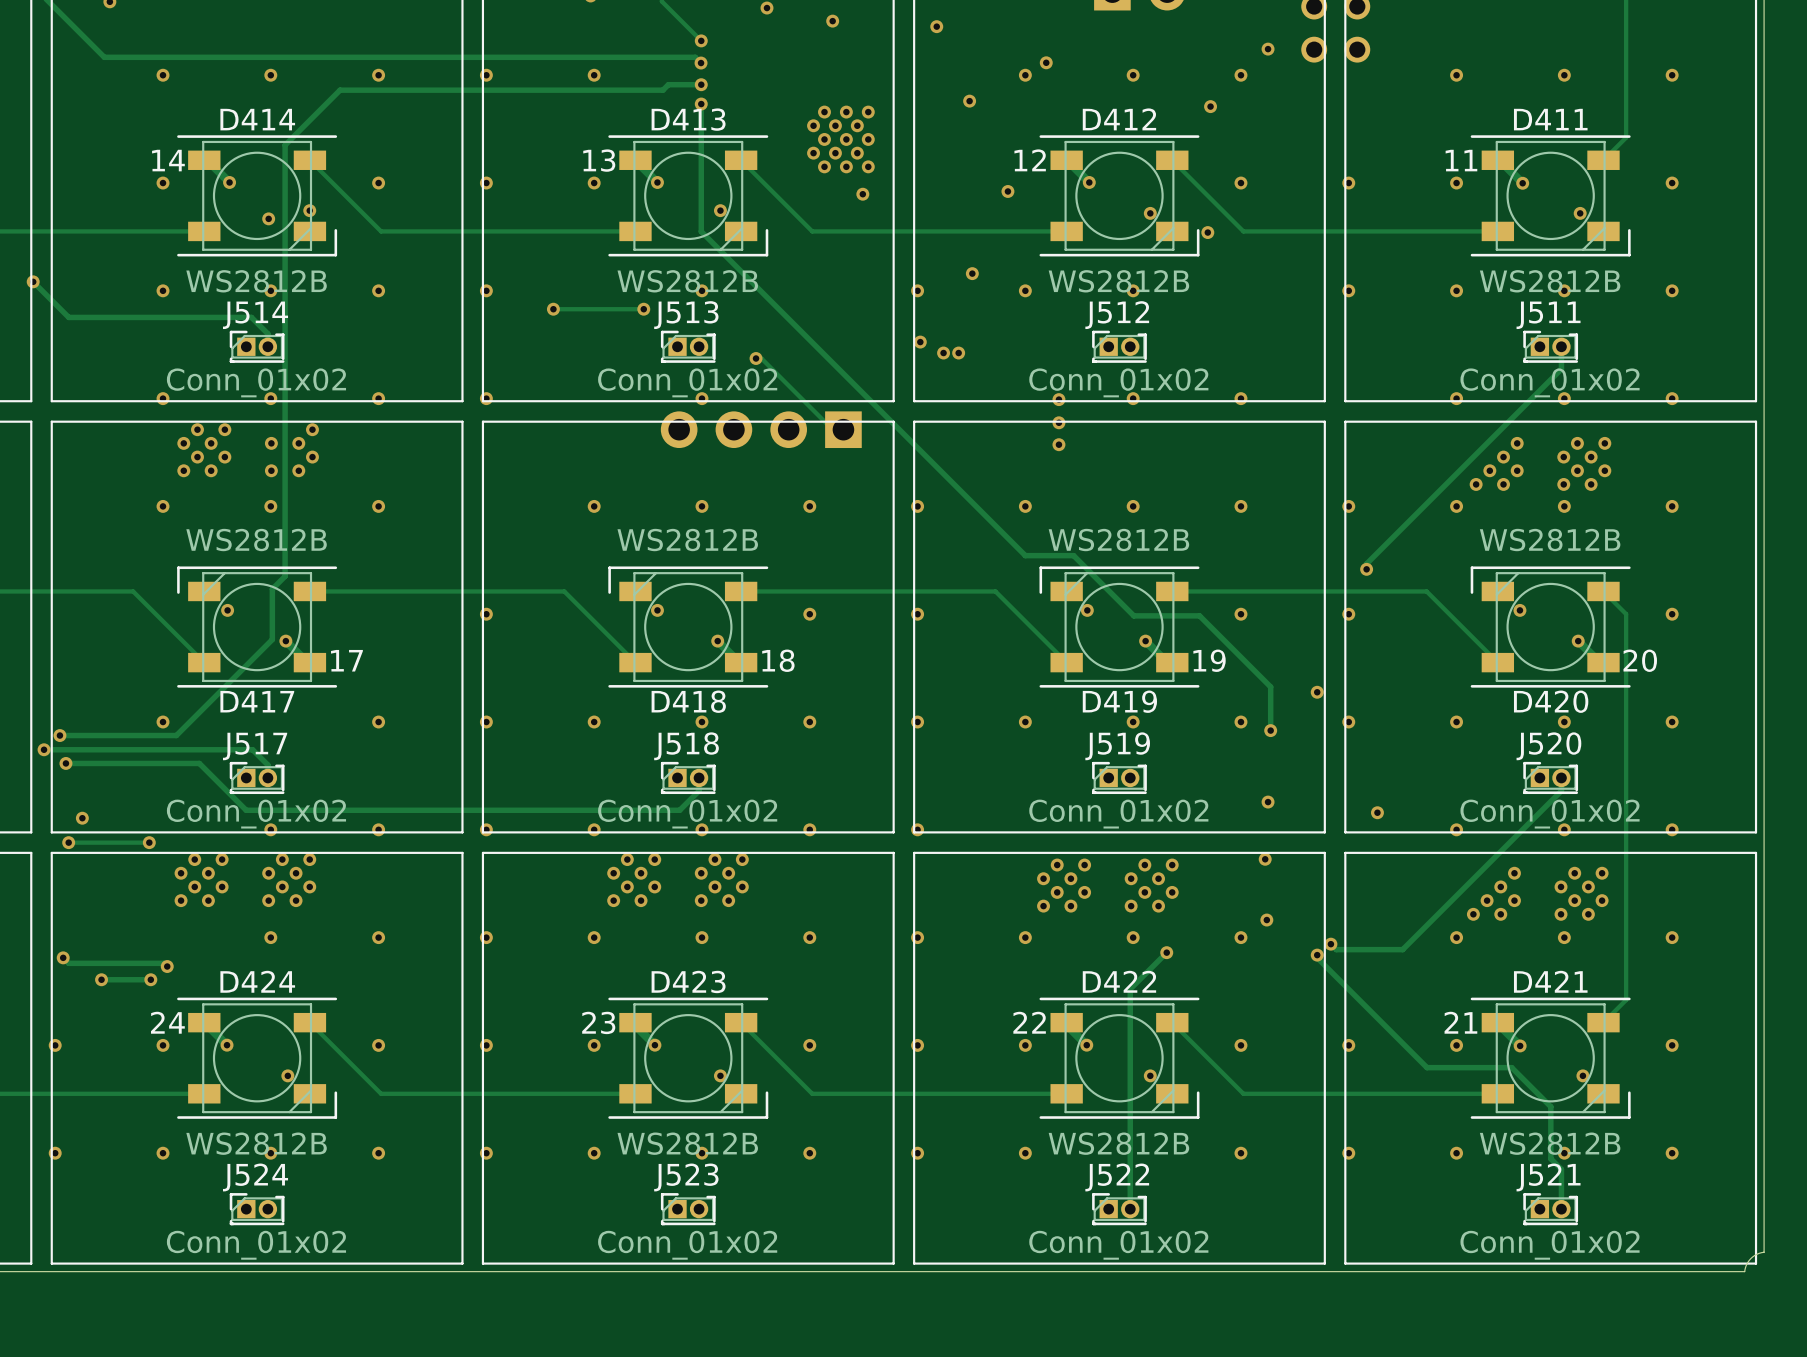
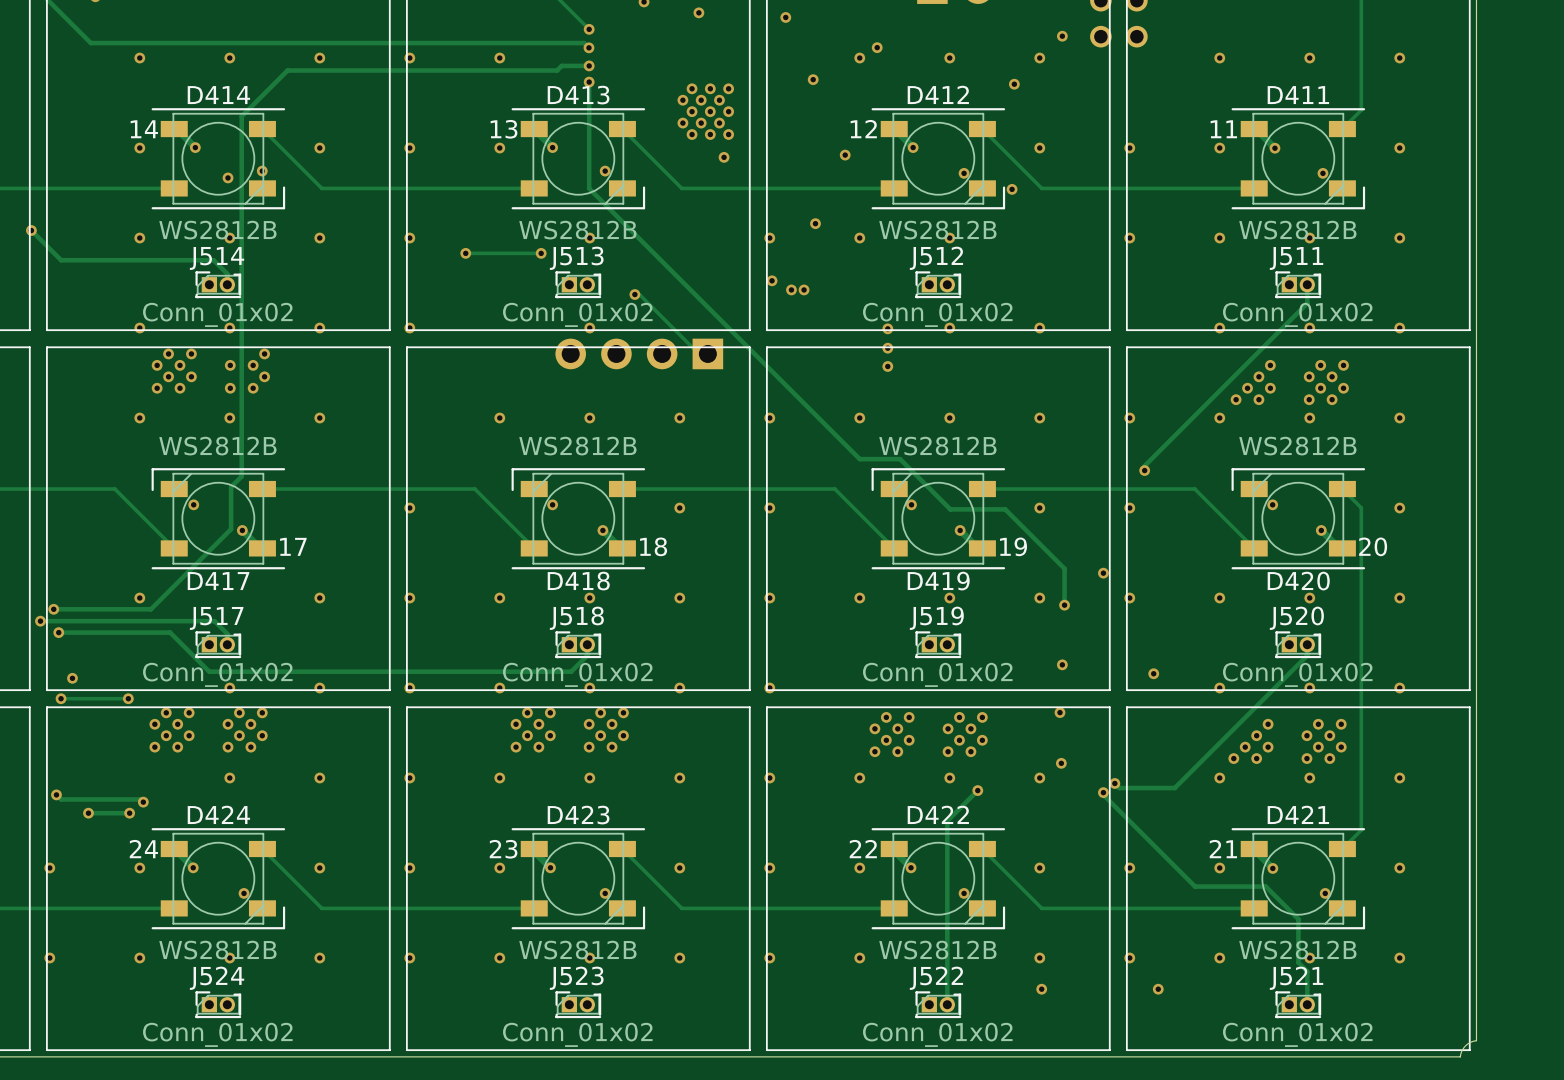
via: none -> (1041, 989)
via: none -> (1158, 989)

